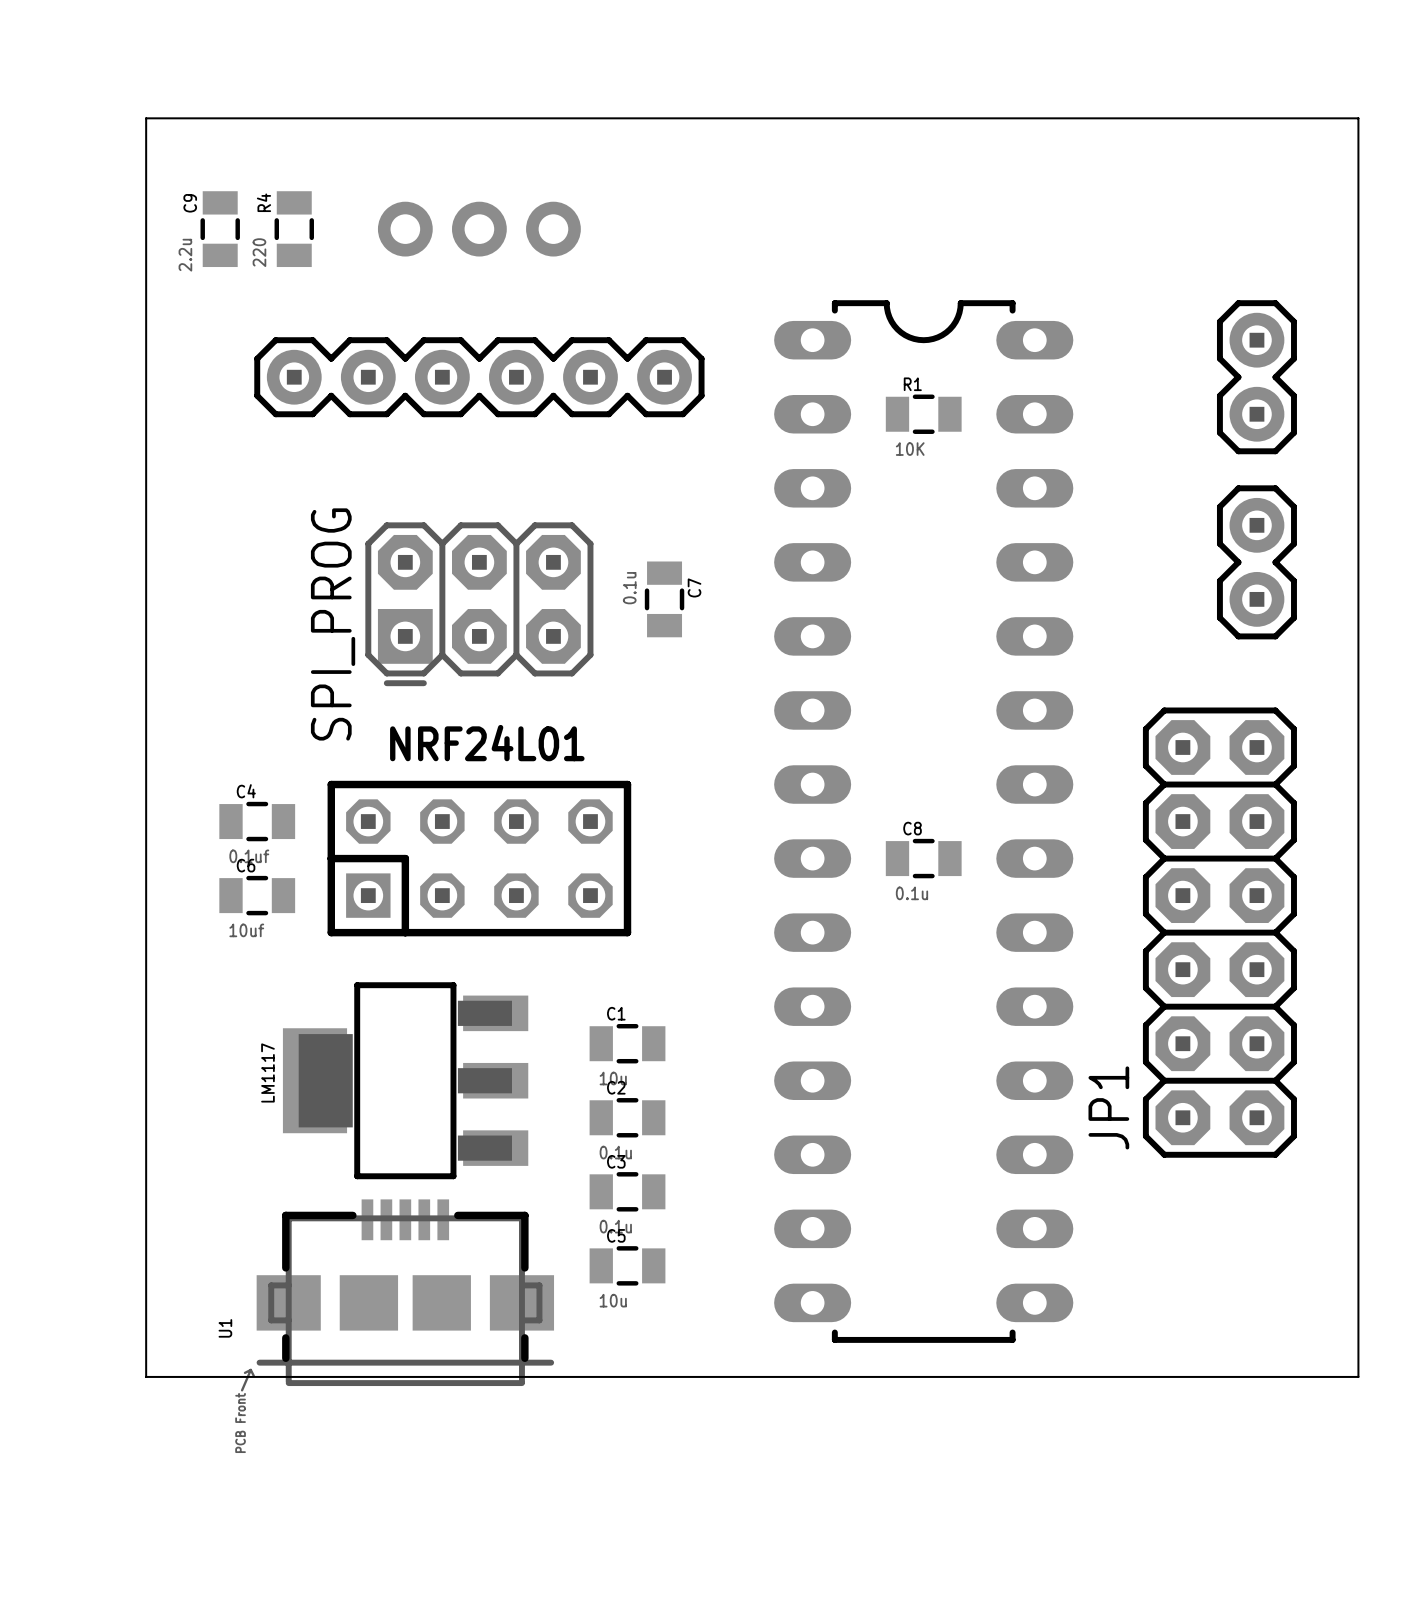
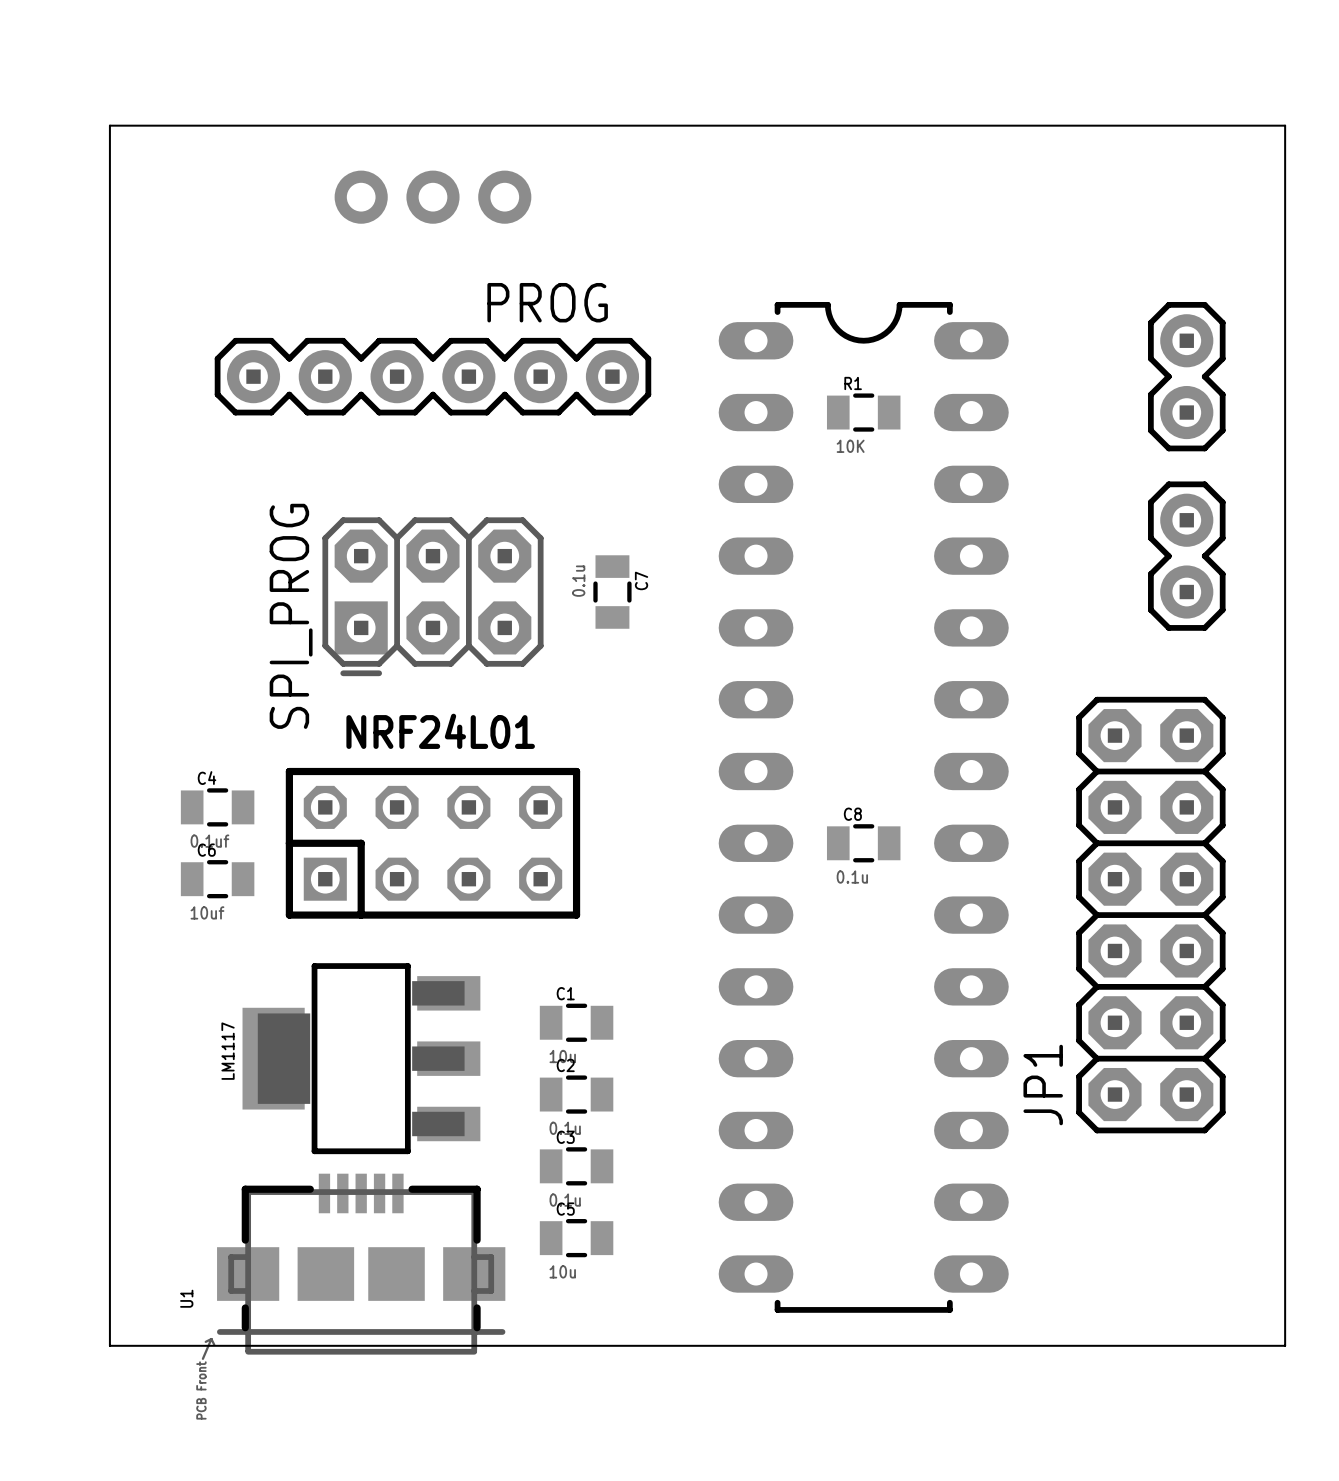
C9: 2.2u (220, 229) -> none
R4: 220 (294, 229) -> none
part position: (479, 229) -> (432, 197)
PROG name: none -> PROG (547, 302)

